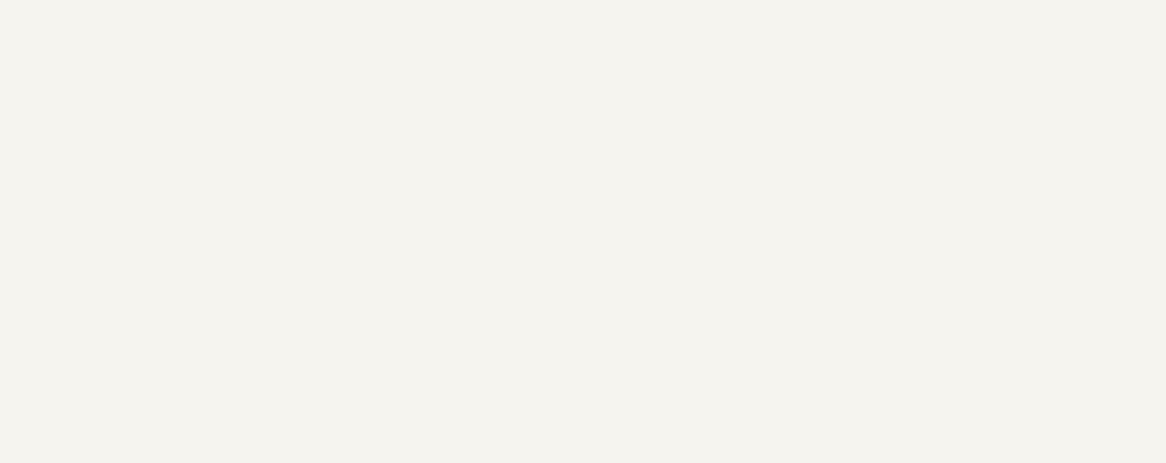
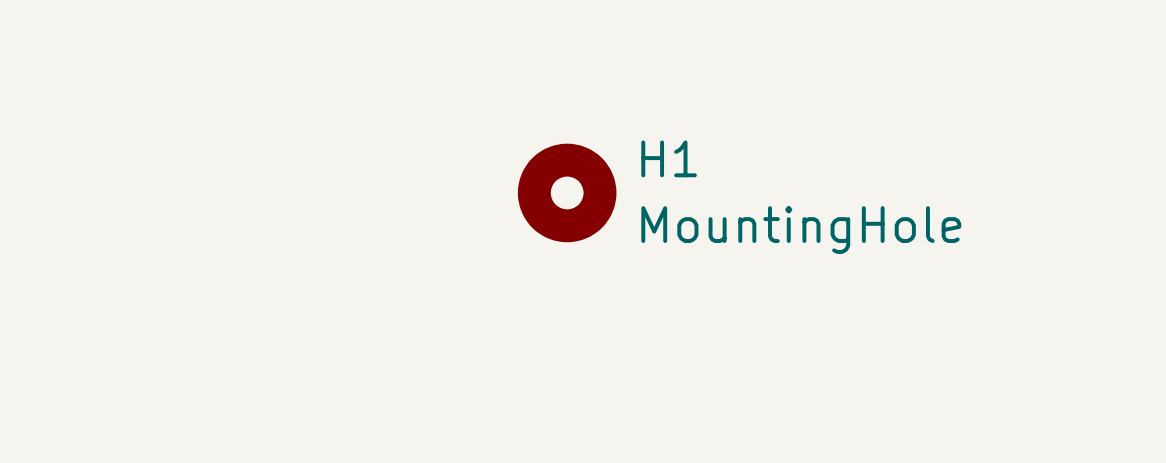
H1: none -> MountingHole (567, 192)

